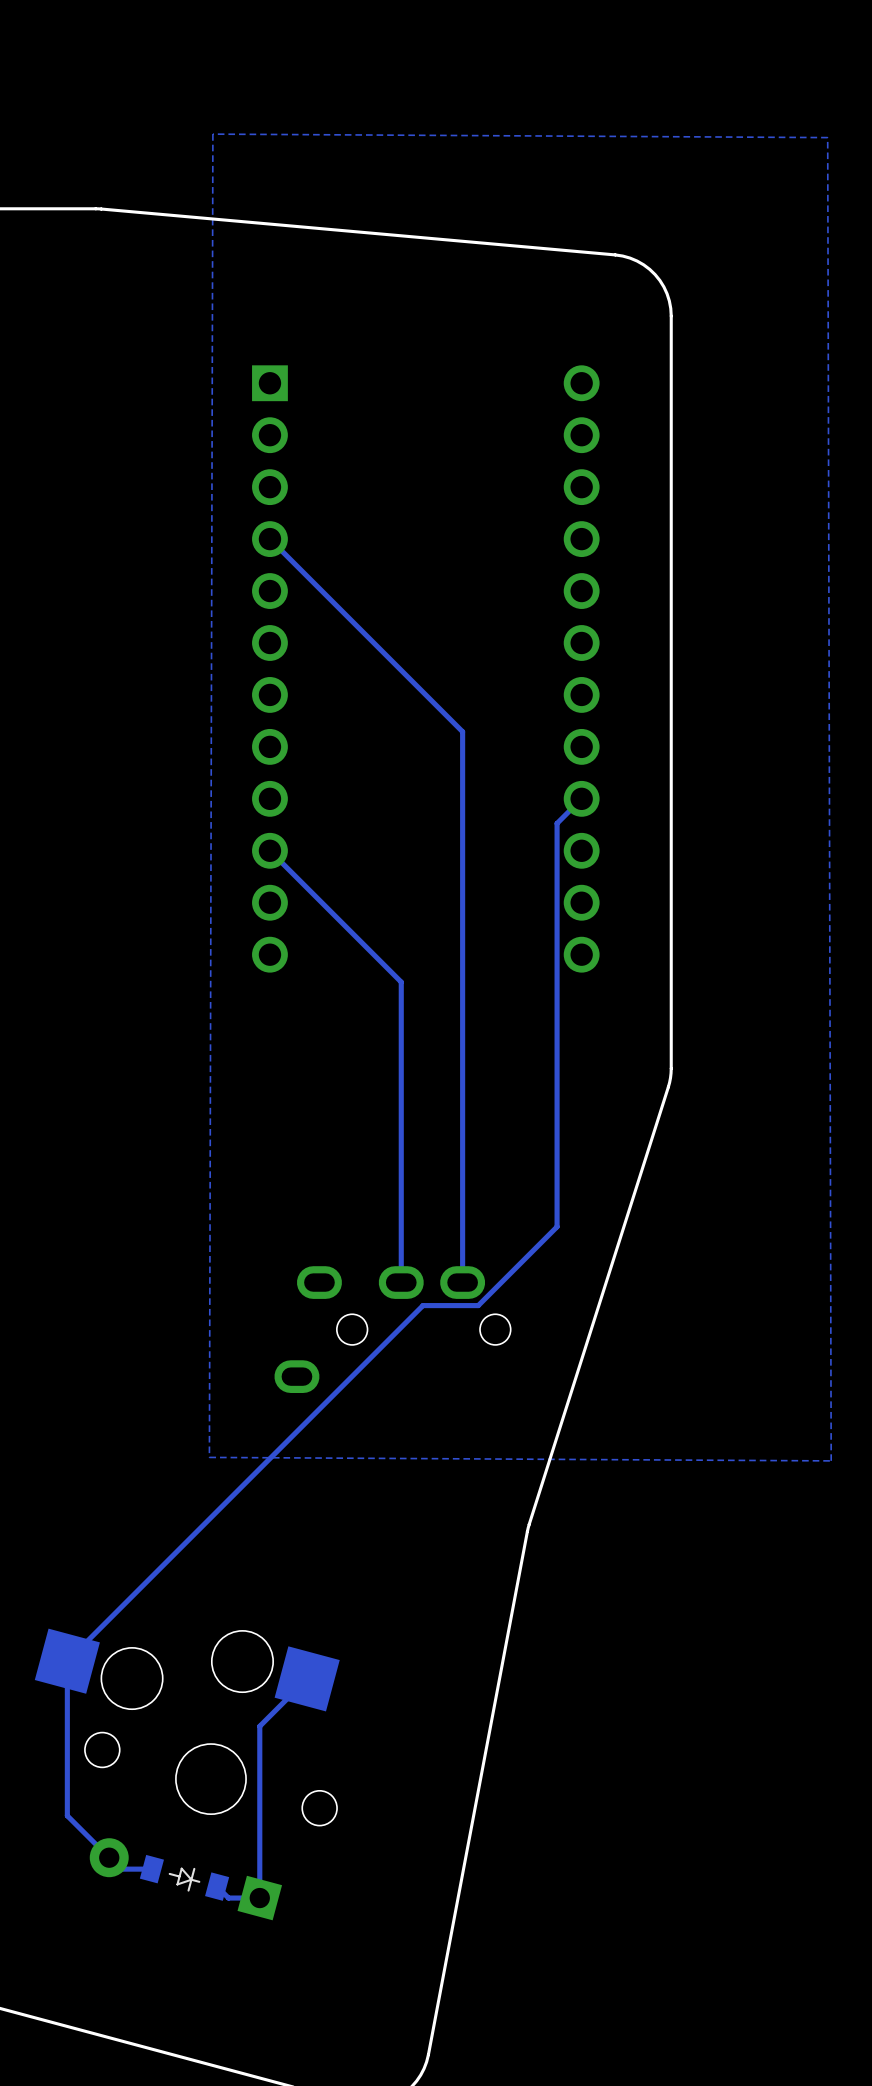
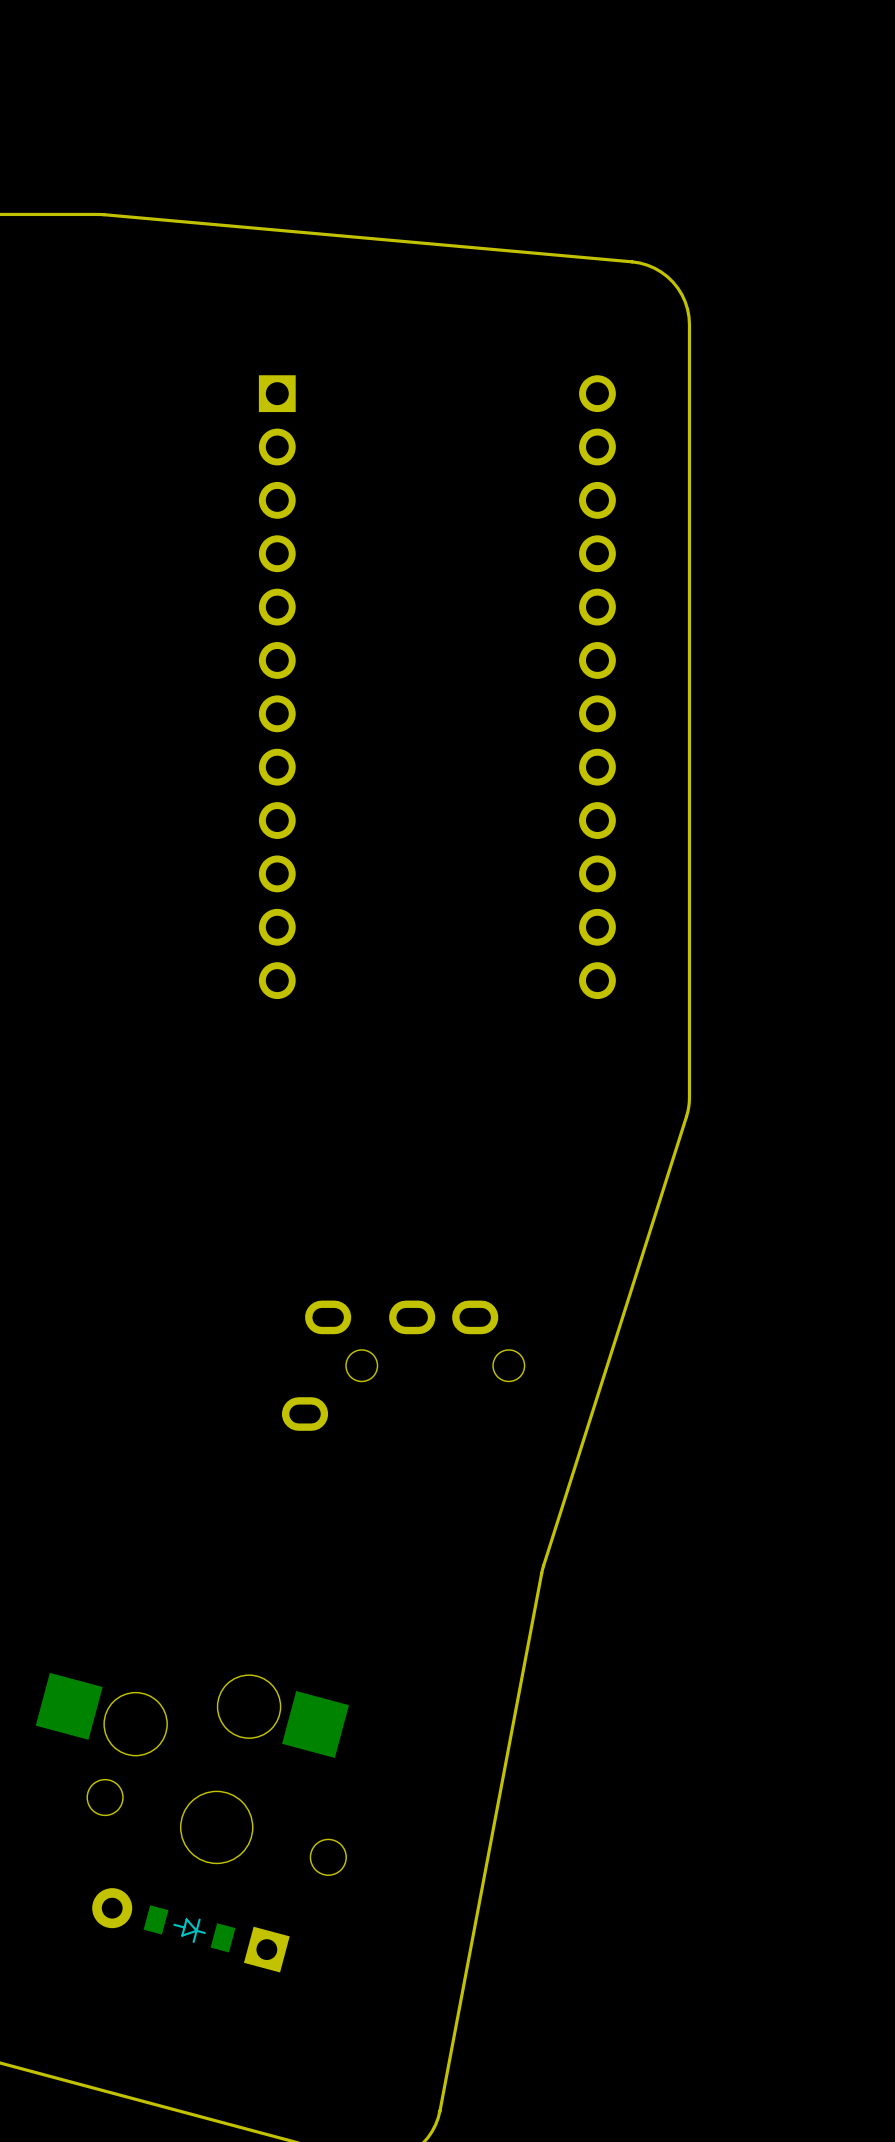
zone outline: (212, 134) (209, 1457) (831, 1460) (827, 137) (212, 134) -> none
track: (269, 539) (462, 731) (462, 1282) -> none
track: (581, 798) (557, 823) (557, 1226) (478, 1305) (422, 1305) (67, 1661) (67, 1815) (120, 1869) (151, 1869) -> none
track: (269, 850) (401, 982) (401, 1282) -> none
track: (307, 1678) (259, 1726) (259, 1898) (228, 1898) (217, 1886) -> none

